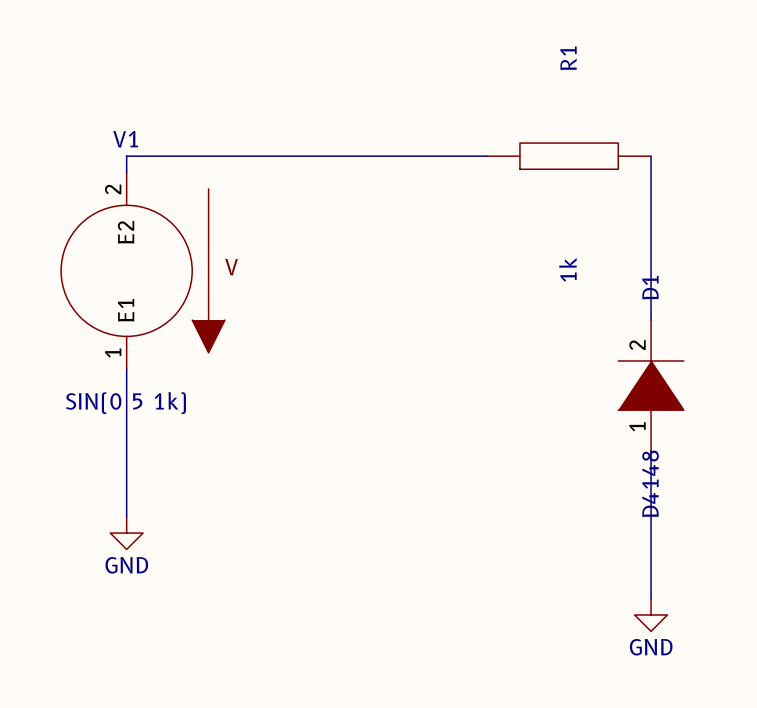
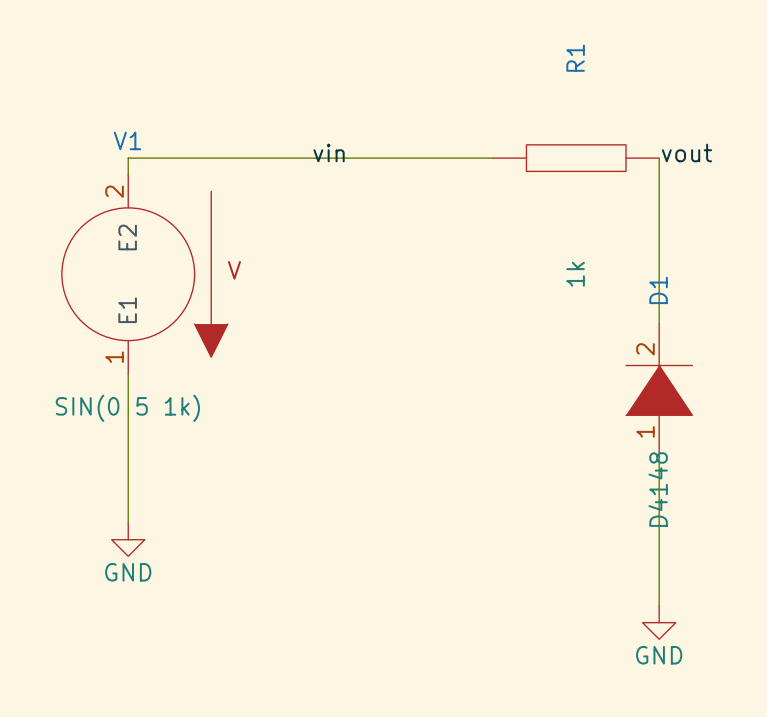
label: none -> vin (329, 153)
label: none -> vout (686, 153)

